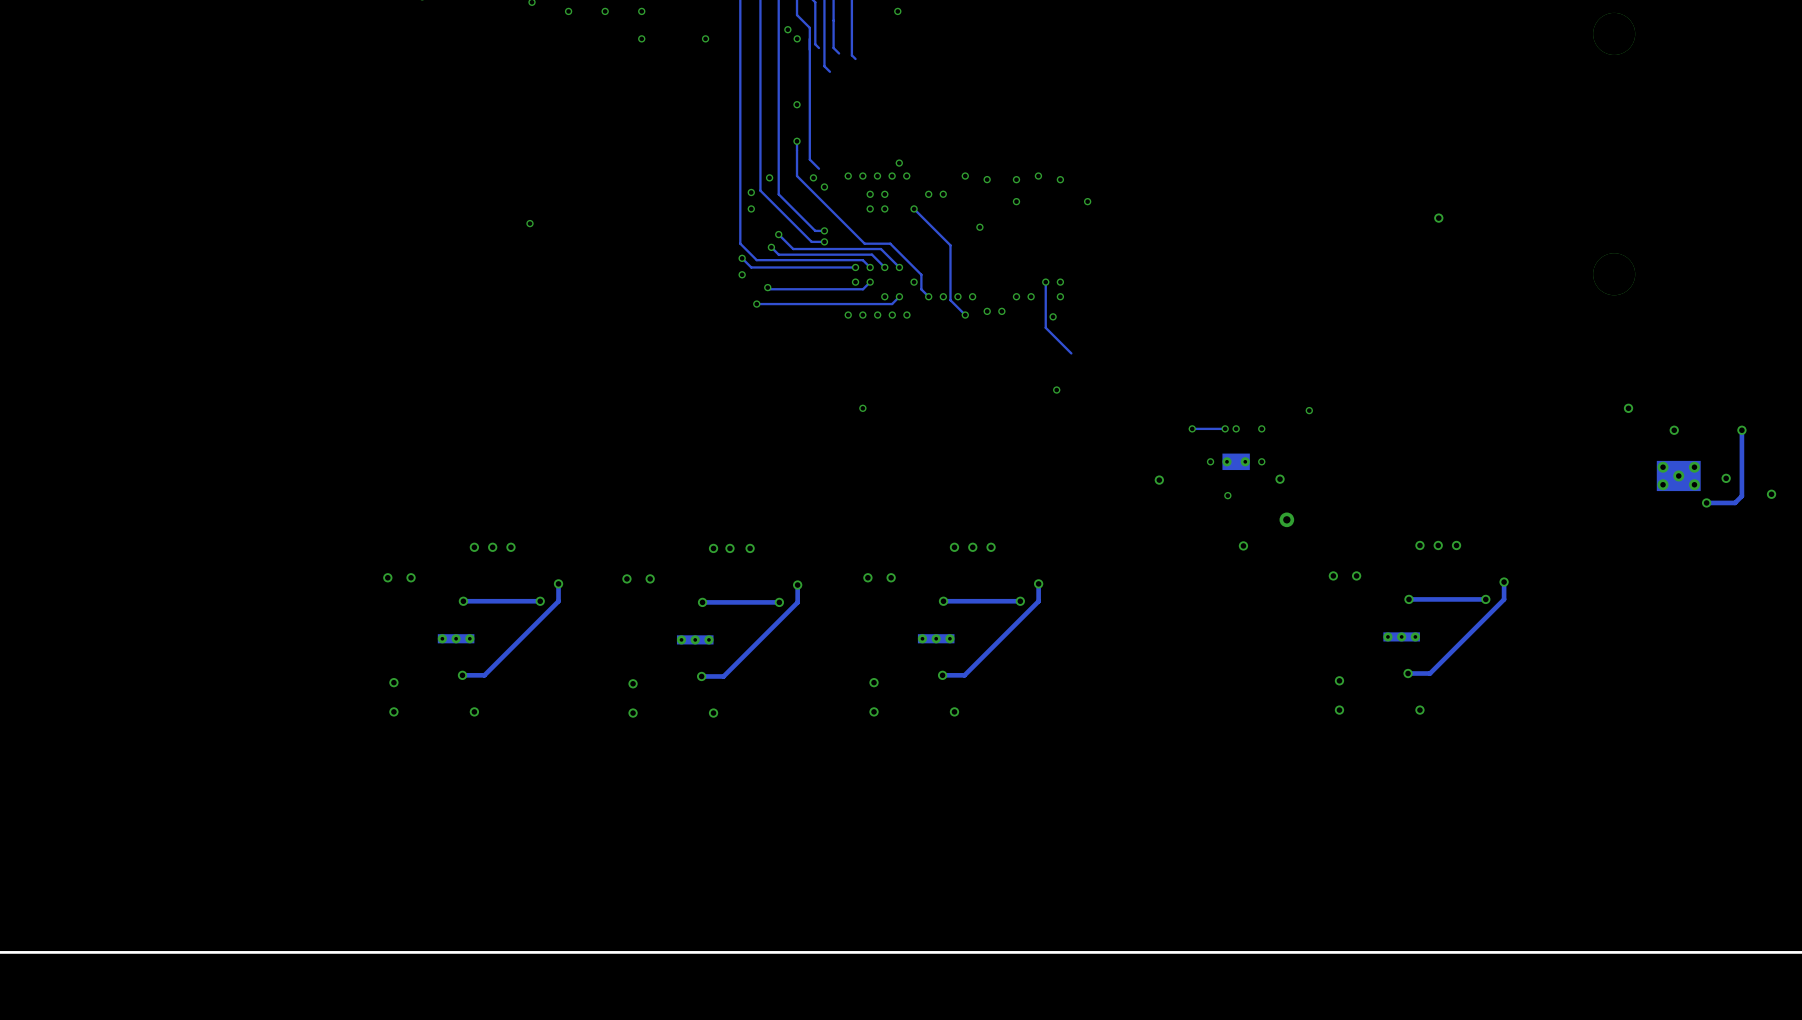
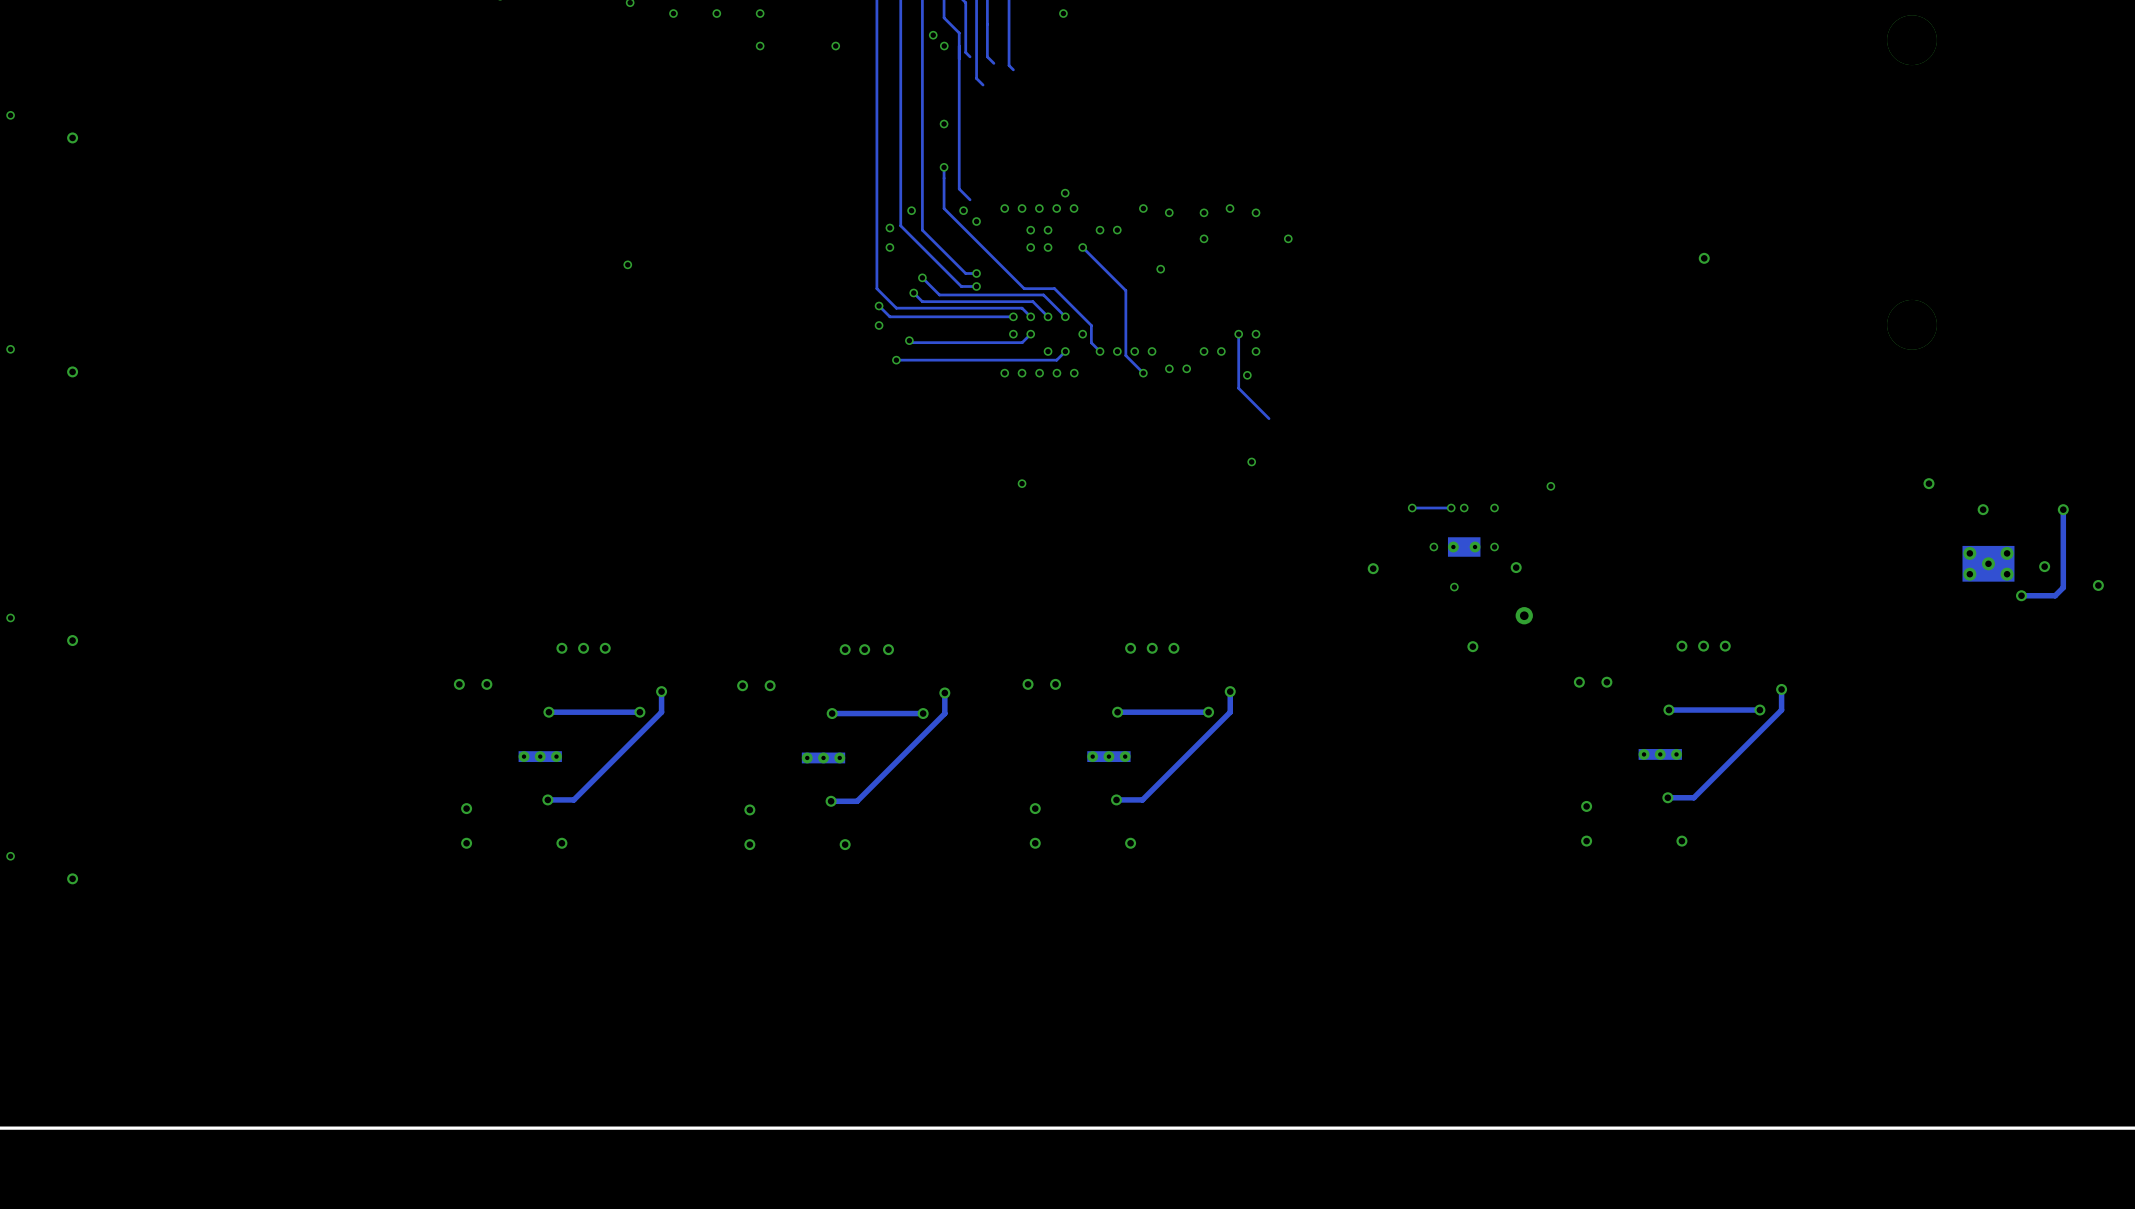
via: none -> (10, 115)
via: none -> (72, 137)
via: none -> (10, 349)
via: none -> (72, 371)
via: none -> (10, 617)
via: none -> (72, 640)
via: none -> (10, 856)
via: none -> (72, 878)

